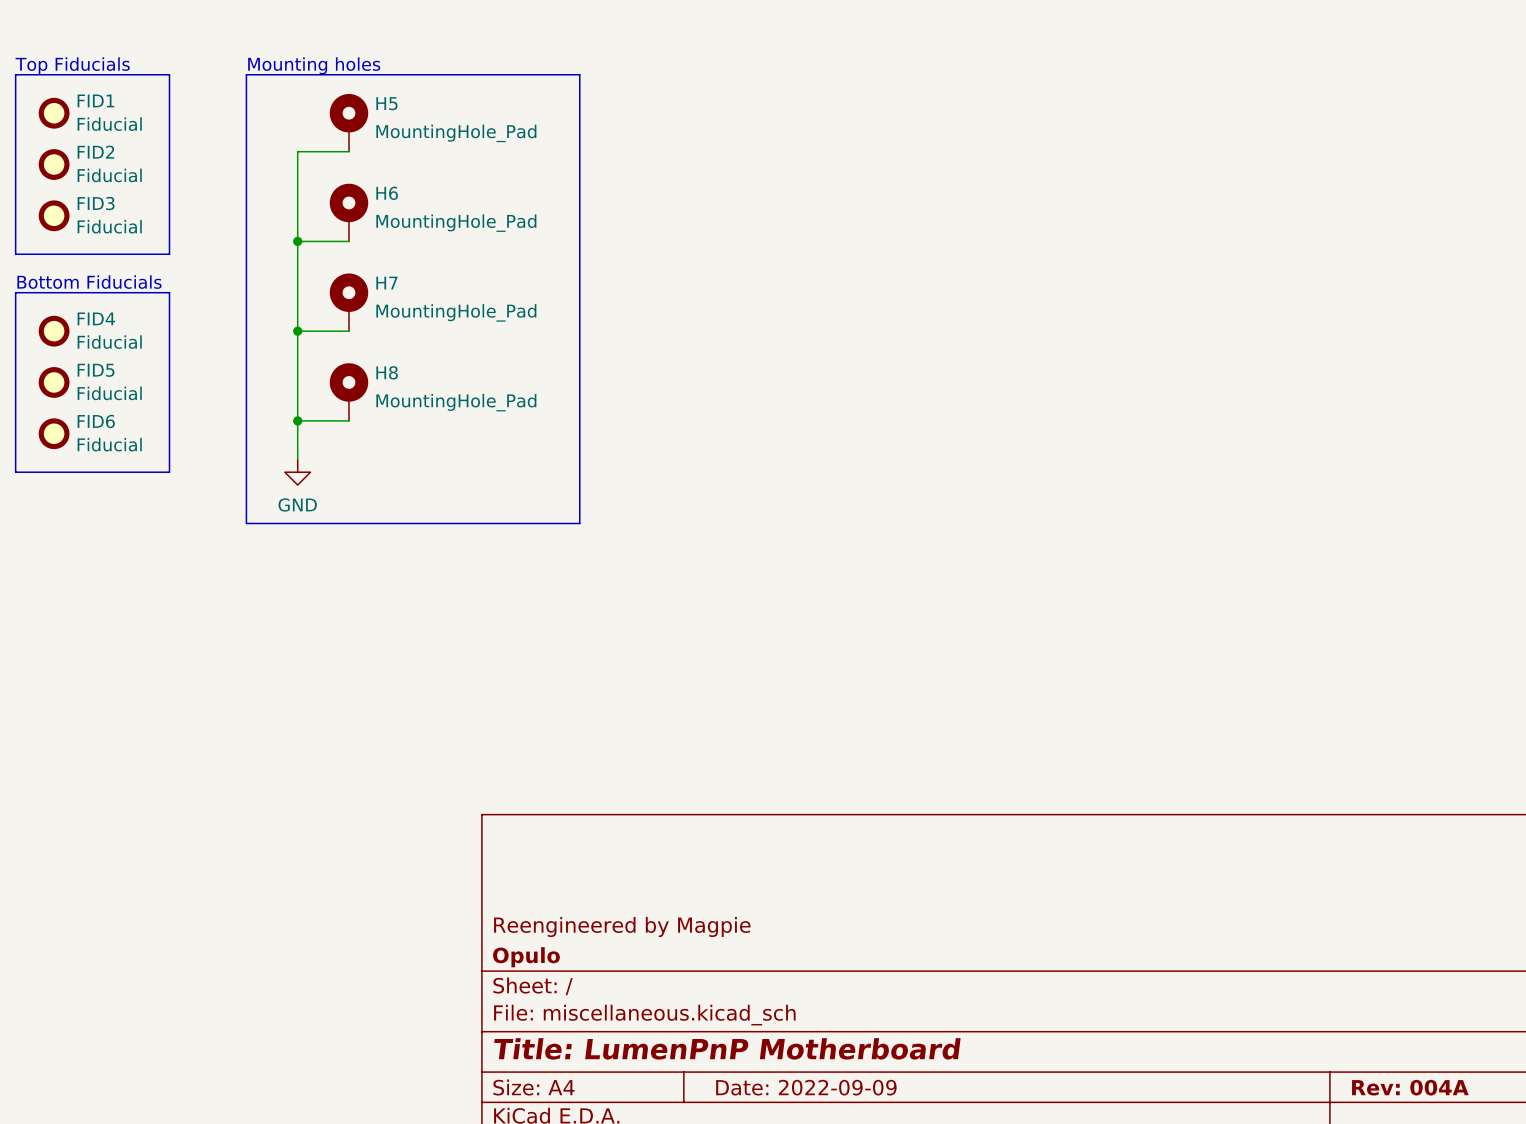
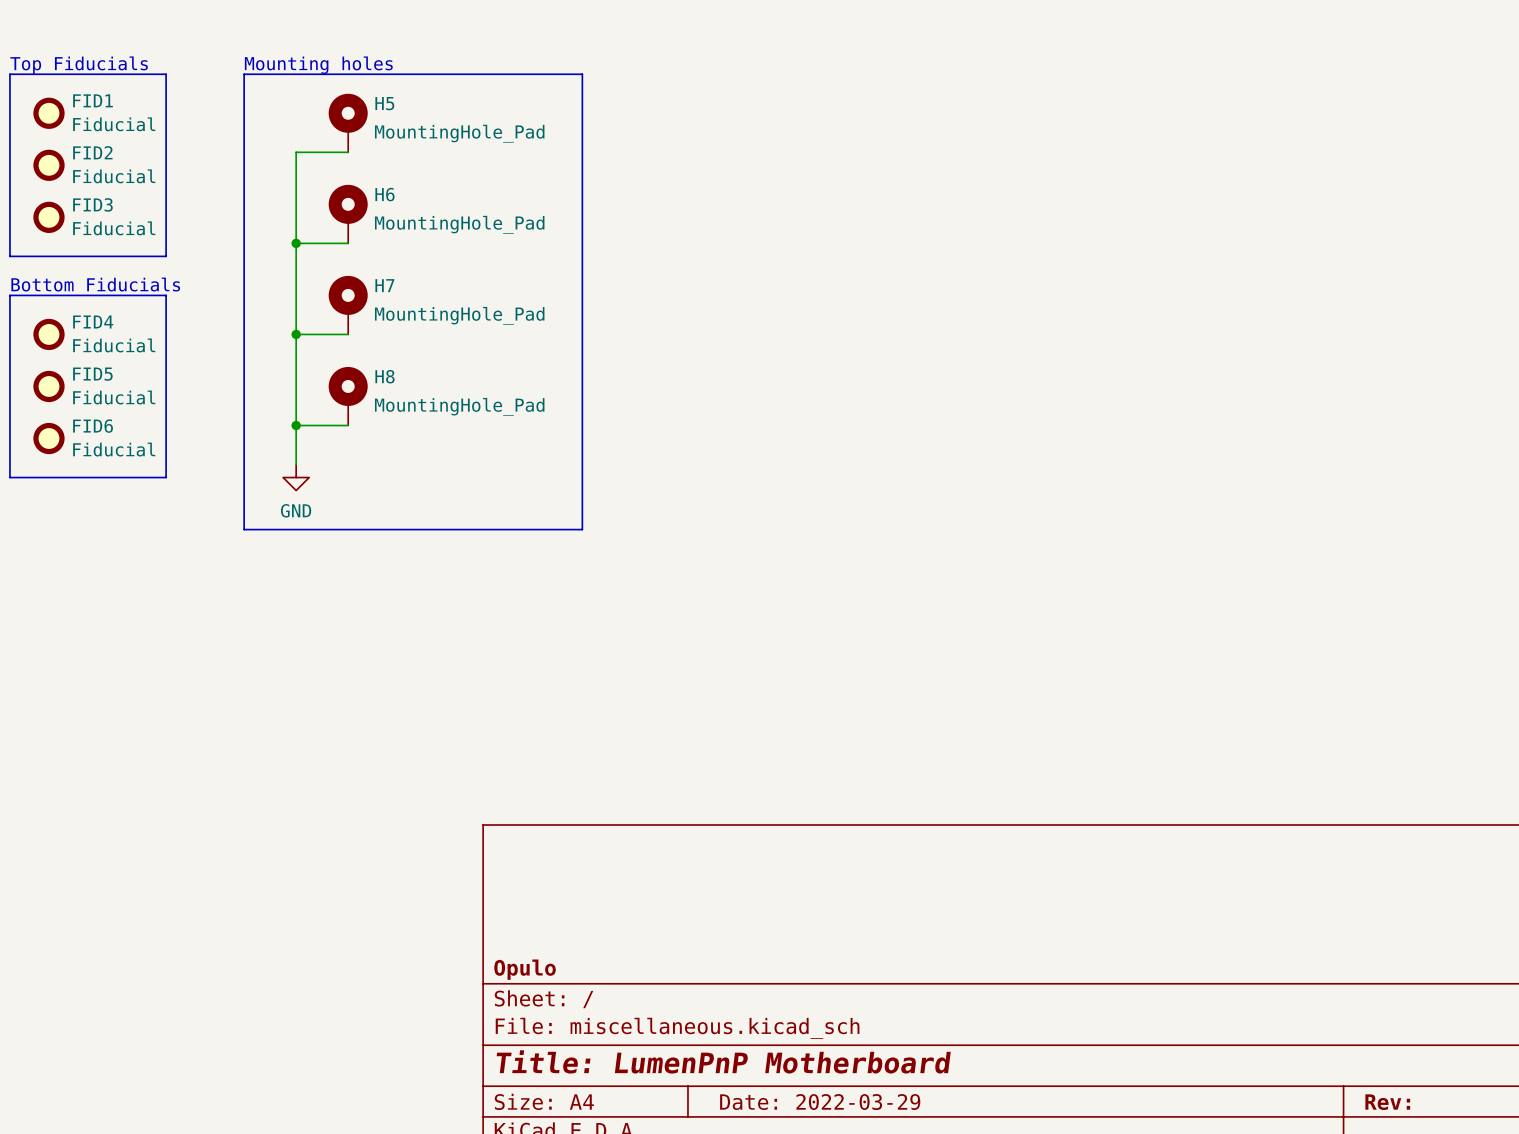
title block: Reengineered by Magpie (622, 926) -> none
title block: Date: 2022-09-09 (806, 1087) -> Date: 2022-03-29 (820, 1102)
title block: Rev: 004A (1410, 1087) -> Rev: (1387, 1102)

